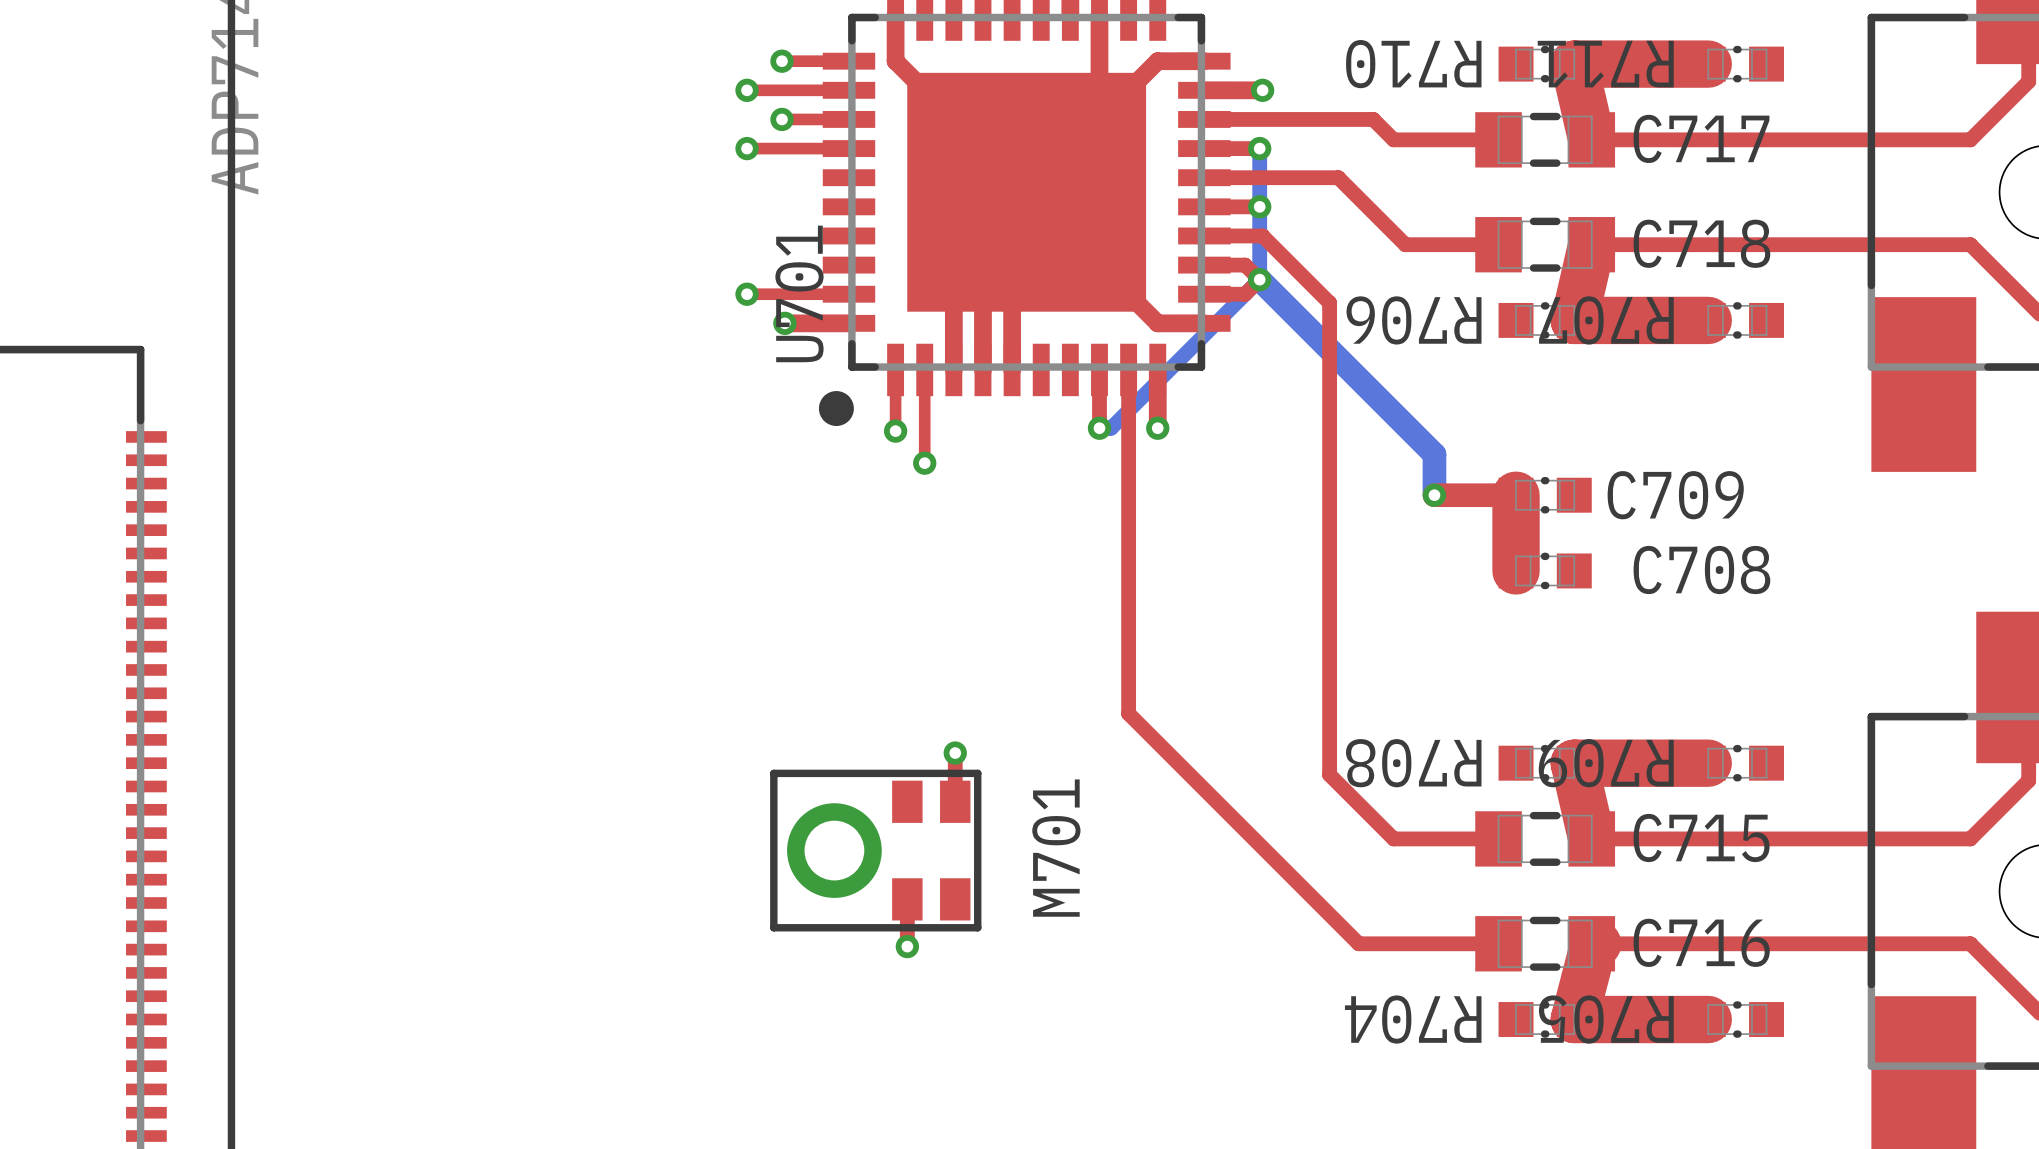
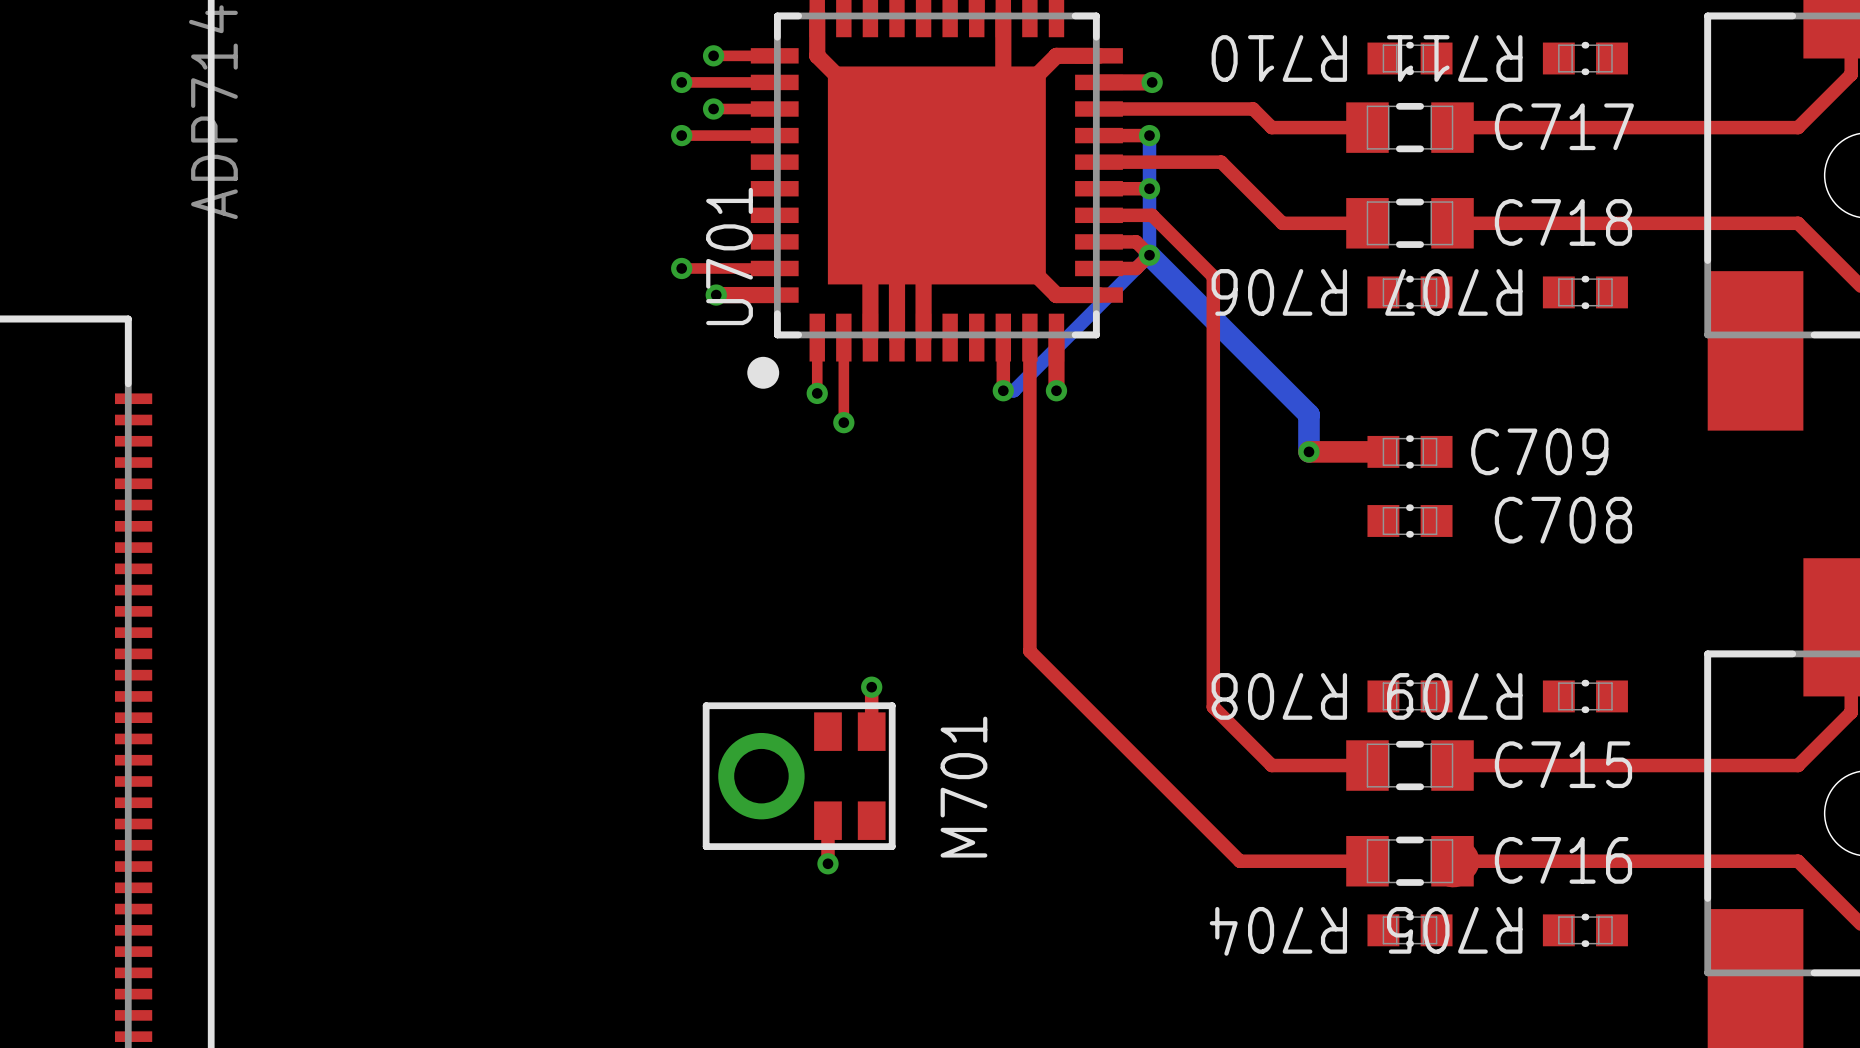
top track: (1708, 64) (1574, 64) (1591, 139) -> none
top track: (1591, 244) (1574, 320) (1708, 320) -> none
top track: (1516, 495) (1516, 570) -> none
top track: (1708, 763) (1574, 763) (1591, 838) -> none
top track: (1592, 948) (1574, 1019) (1708, 1019) -> none

